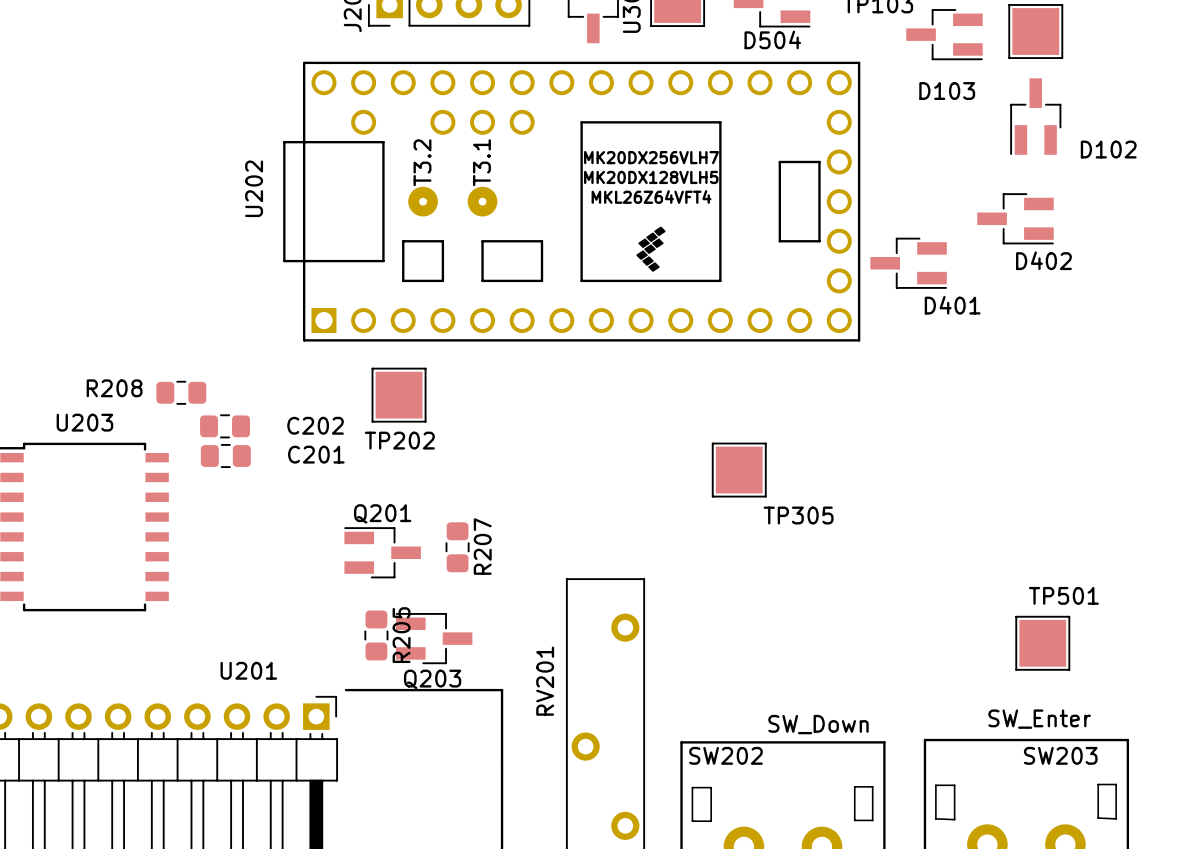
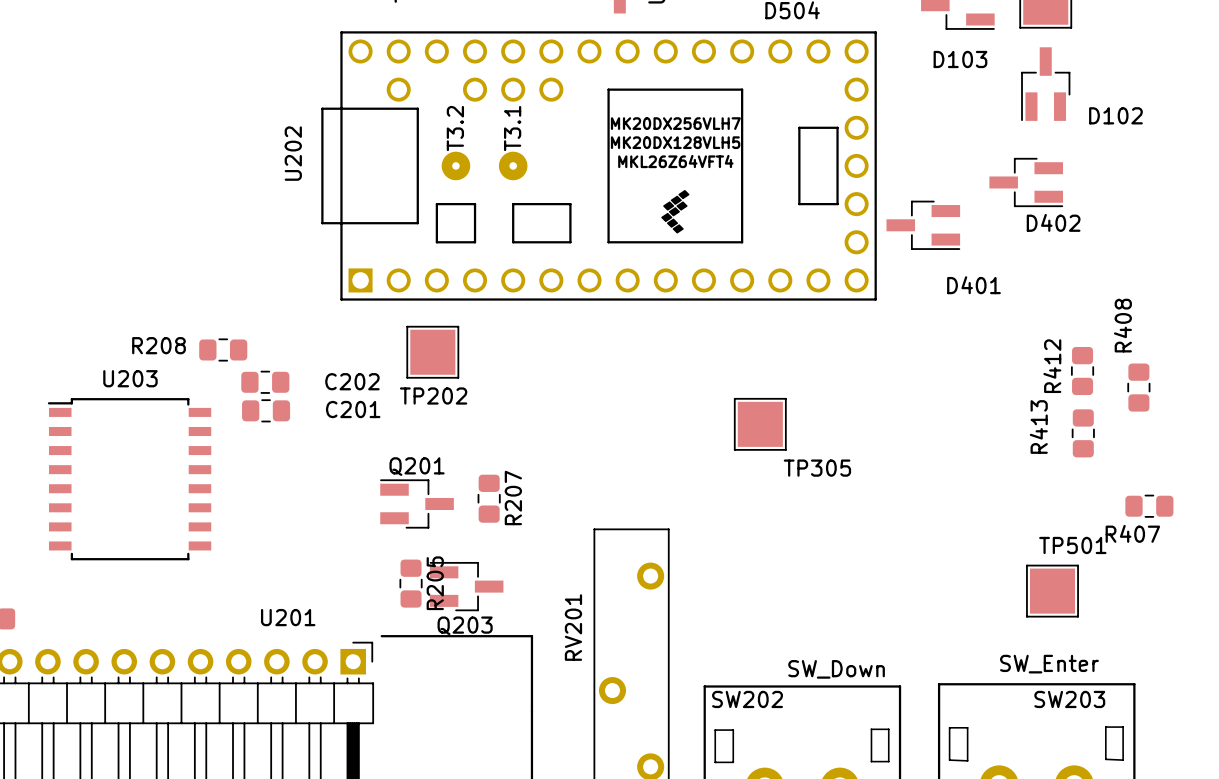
D401 name position: D401 (952, 305) -> D401 (973, 285)
R412: none -> (1082, 371)
R408: none -> (1138, 387)
R413: none -> (1083, 433)
R407: none -> (1149, 506)

